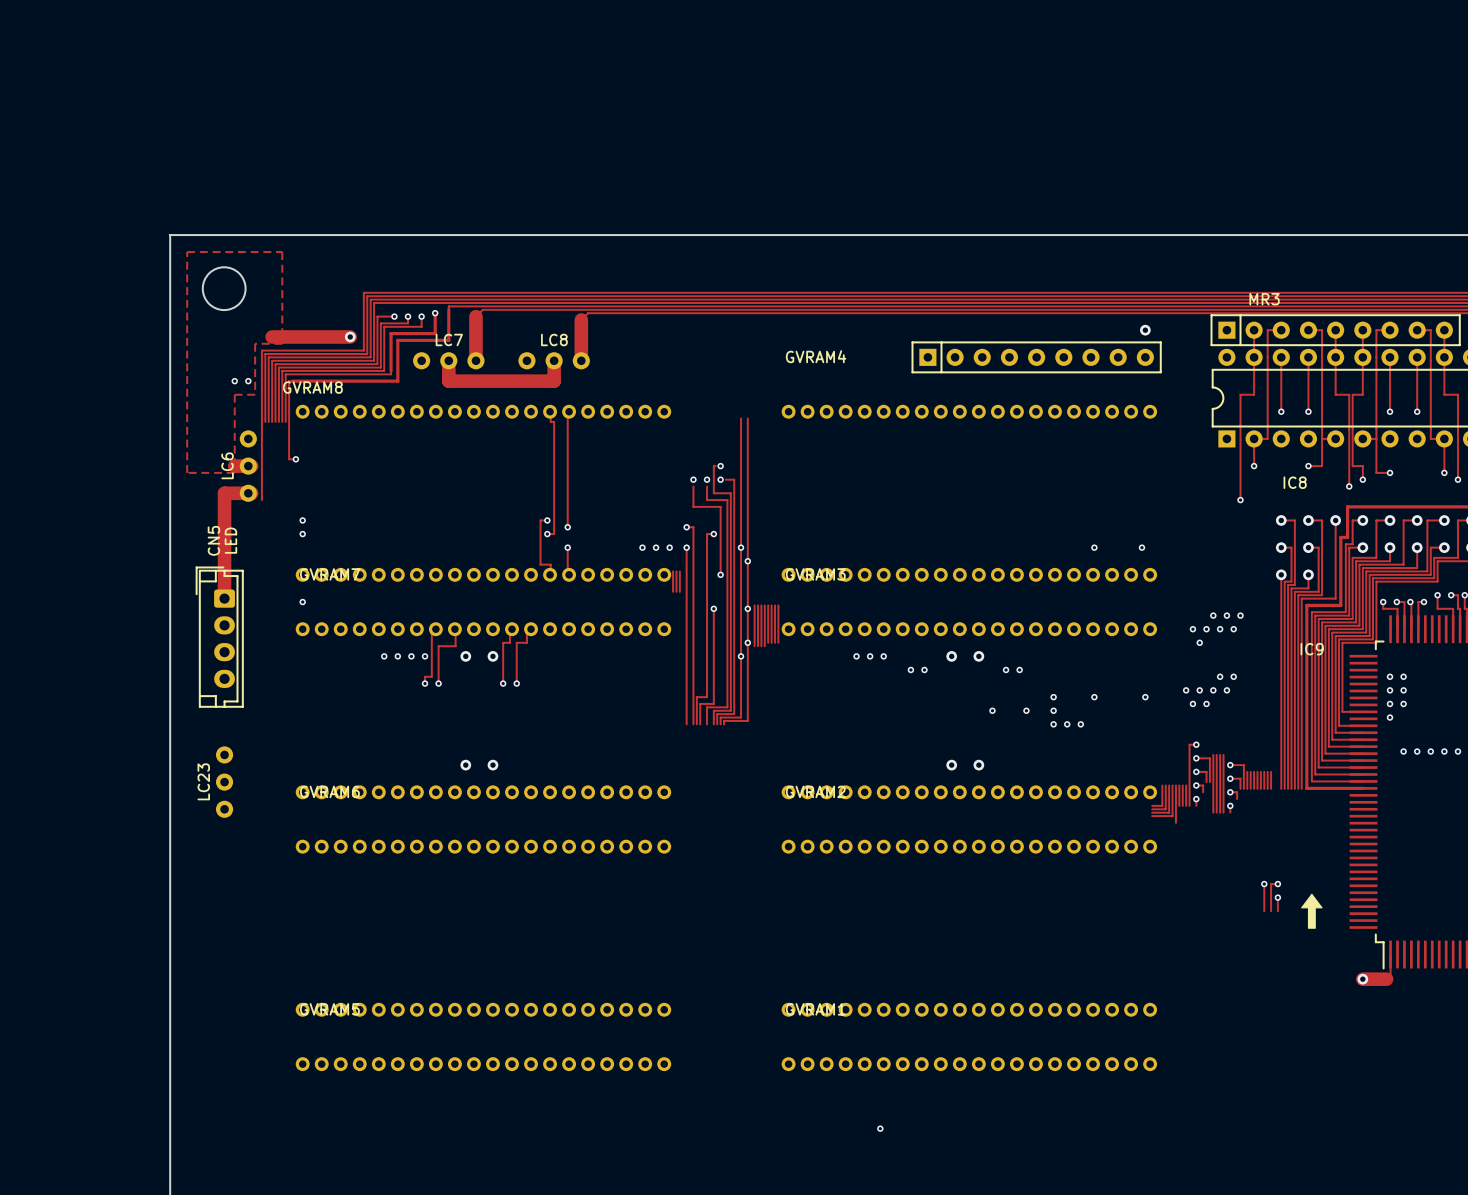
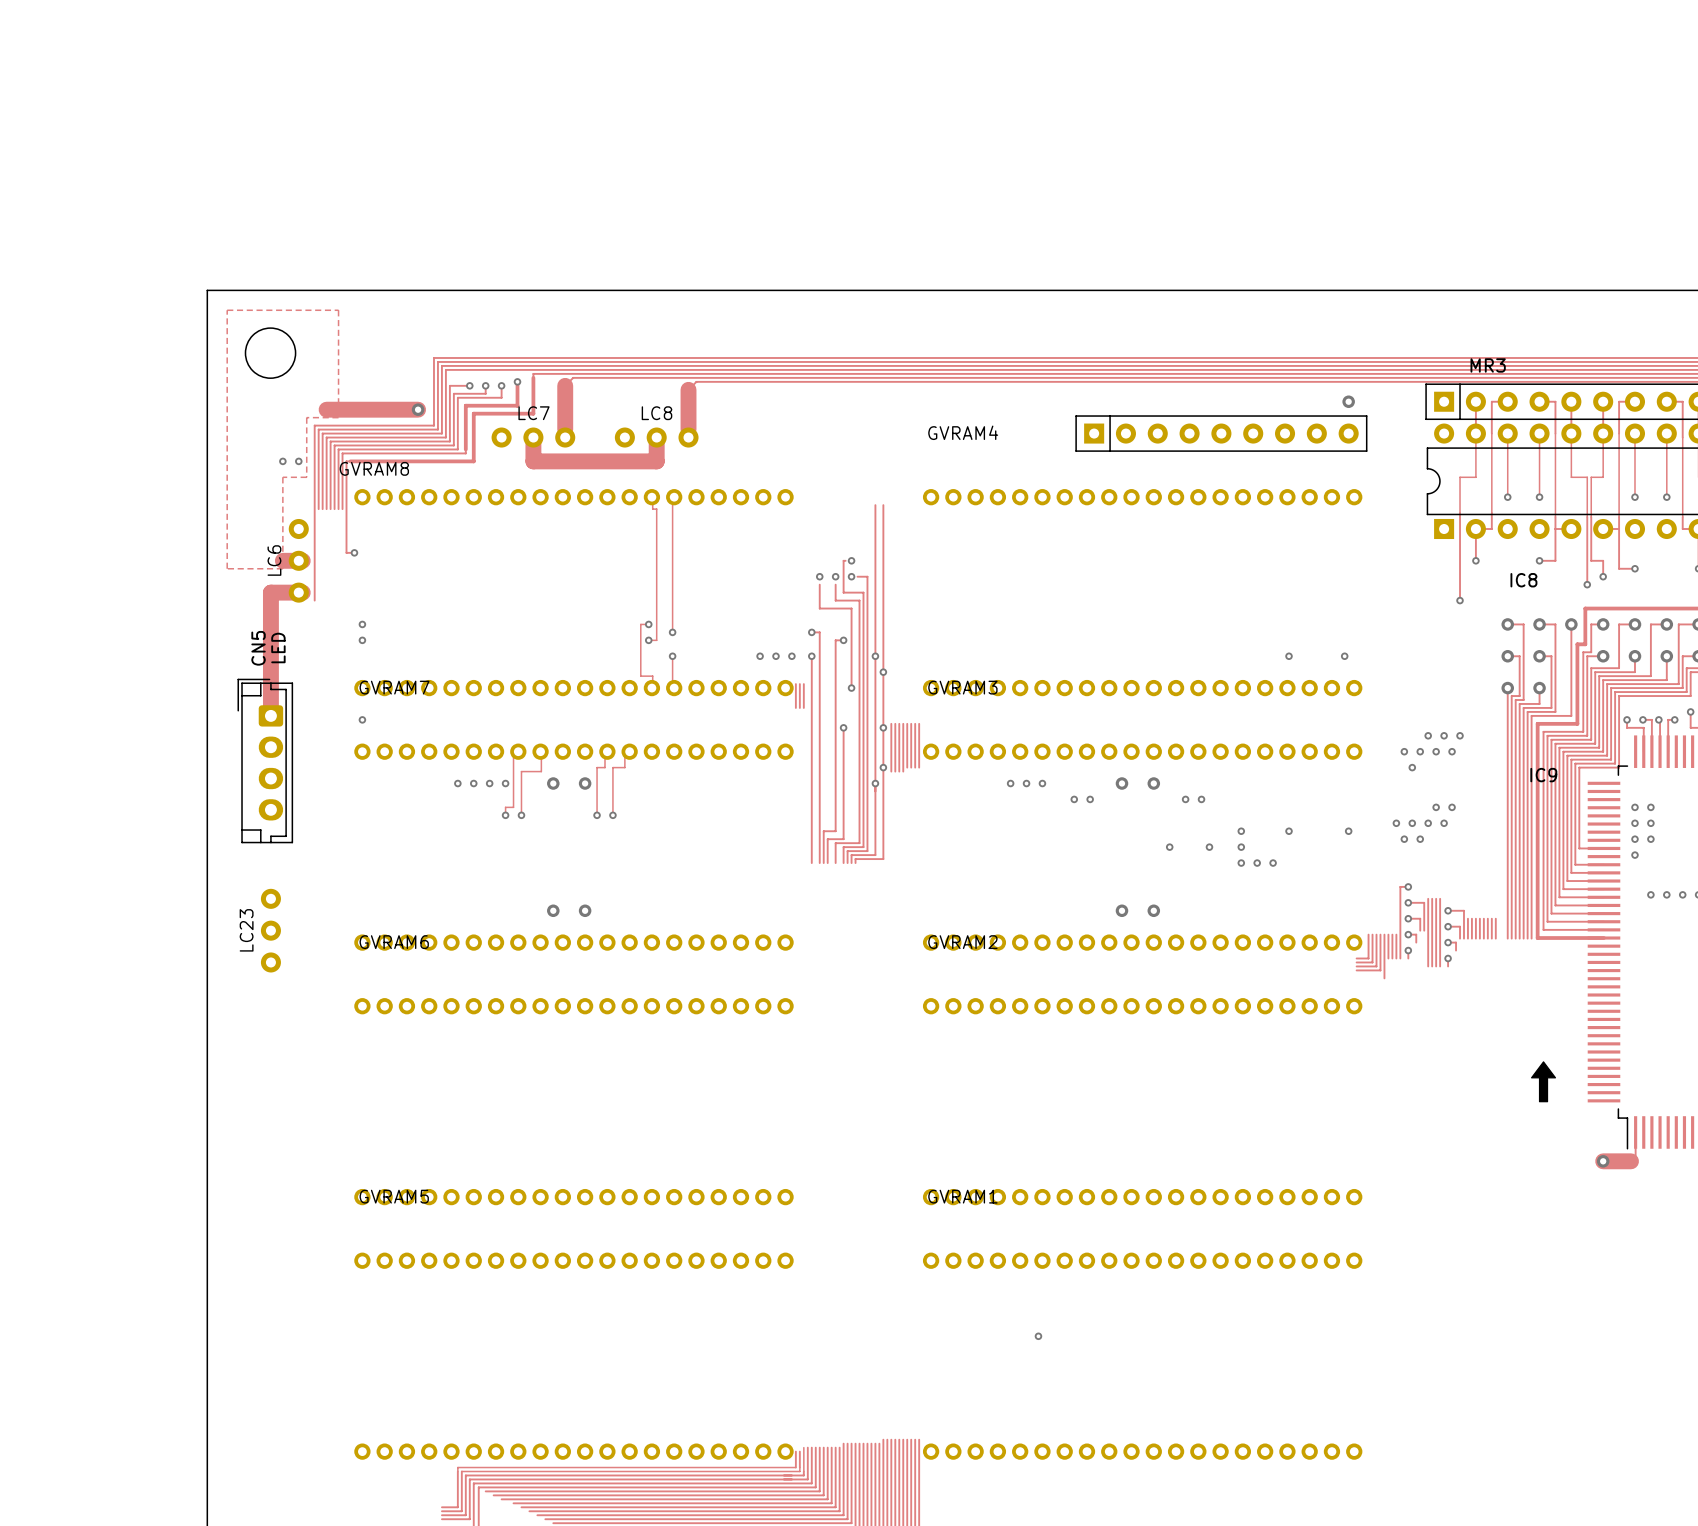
track: (1264, 884) (1264, 911) -> none
via: (1264, 884) -> none
track: (1277, 884) (1271, 884) (1271, 911) -> none
via: (1277, 884) -> none
track: (1277, 897) (1277, 911) -> none
via: (1277, 897) -> none

